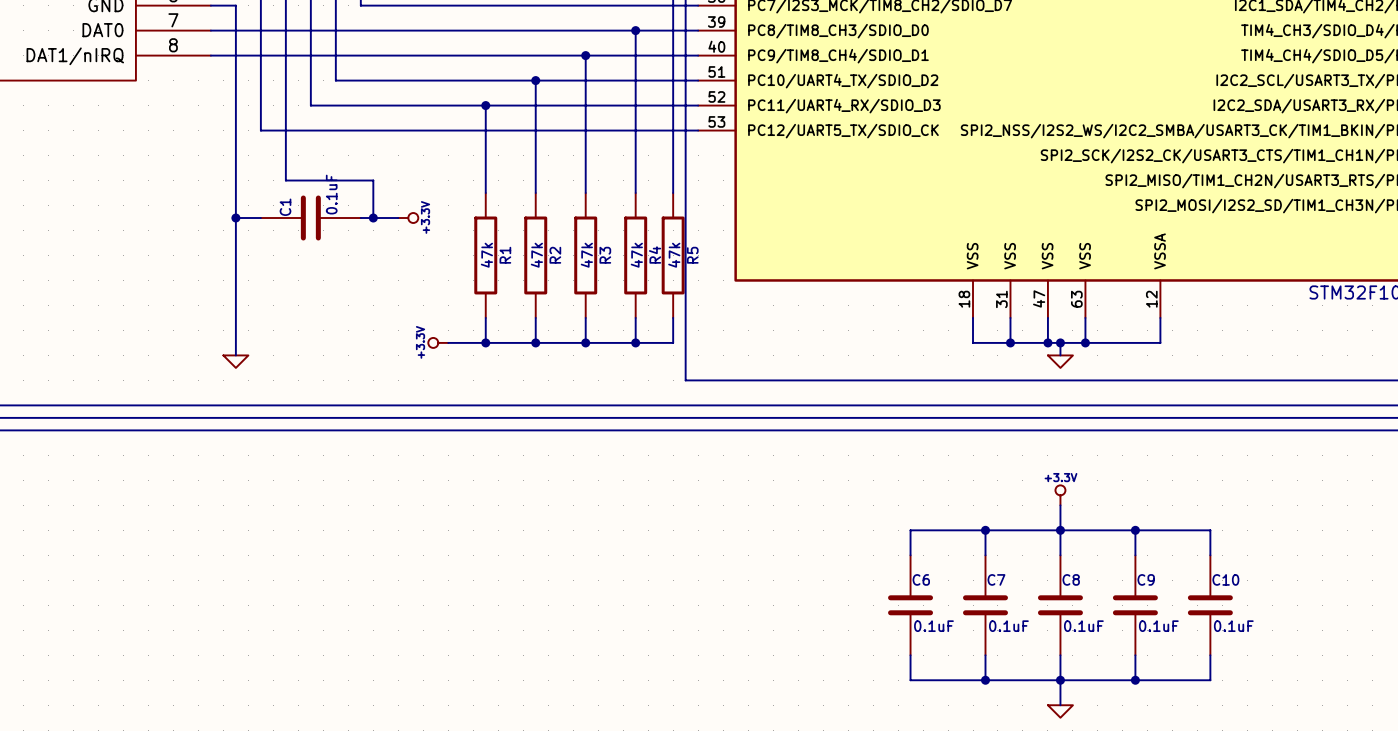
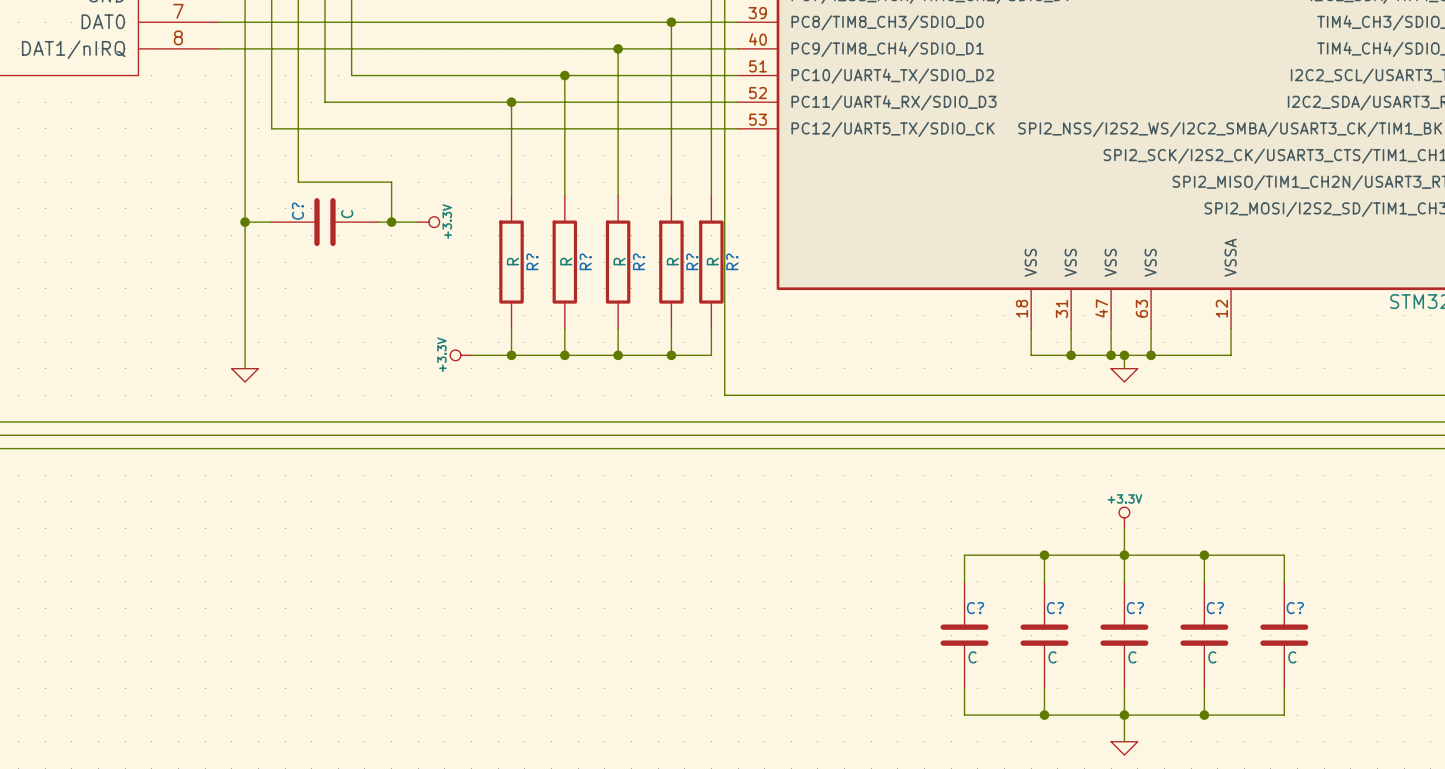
C1 value: 0.1uF (331, 194) -> C (347, 214)
C1 name: C1 (285, 207) -> C? (297, 211)
R1 value: 47k (486, 255) -> R (512, 261)
R1 name: R1 (505, 255) -> R? (532, 261)
R2 value: 47k (536, 255) -> R (566, 261)
R2 name: R2 (555, 255) -> R? (585, 261)
R3 value: 47k (586, 255) -> R (619, 261)
R3 name: R3 (605, 255) -> R? (639, 261)
R4 value: 47k (636, 255) -> R (672, 261)
R4 name: R4 (655, 255) -> R? (692, 261)
R5 value: 47k (674, 255) -> R (712, 261)
R5 name: R5 (692, 255) -> R? (732, 261)
C6 name: C6 (921, 579) -> C? (975, 608)
C7 name: C7 (996, 579) -> C? (1055, 608)
C8 name: C8 (1071, 579) -> C? (1135, 608)
C9 name: C9 (1146, 579) -> C? (1215, 608)
C10 name: C10 (1225, 579) -> C? (1295, 608)
C6 value: 0.1uF (933, 626) -> C (972, 657)
C7 value: 0.1uF (1008, 626) -> C (1052, 657)
C8 value: 0.1uF (1083, 626) -> C (1132, 657)
C9 value: 0.1uF (1158, 626) -> C (1212, 657)
C10 value: 0.1uF (1233, 626) -> C (1292, 657)

